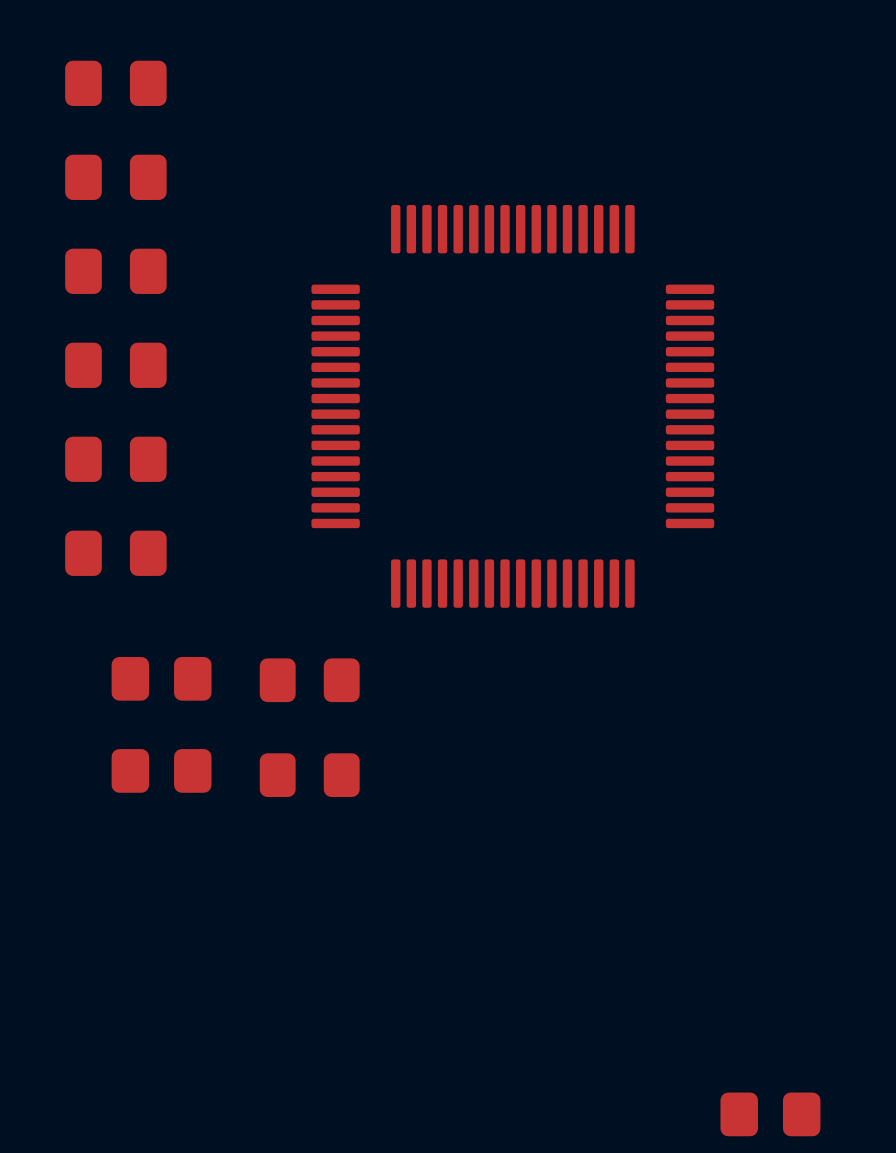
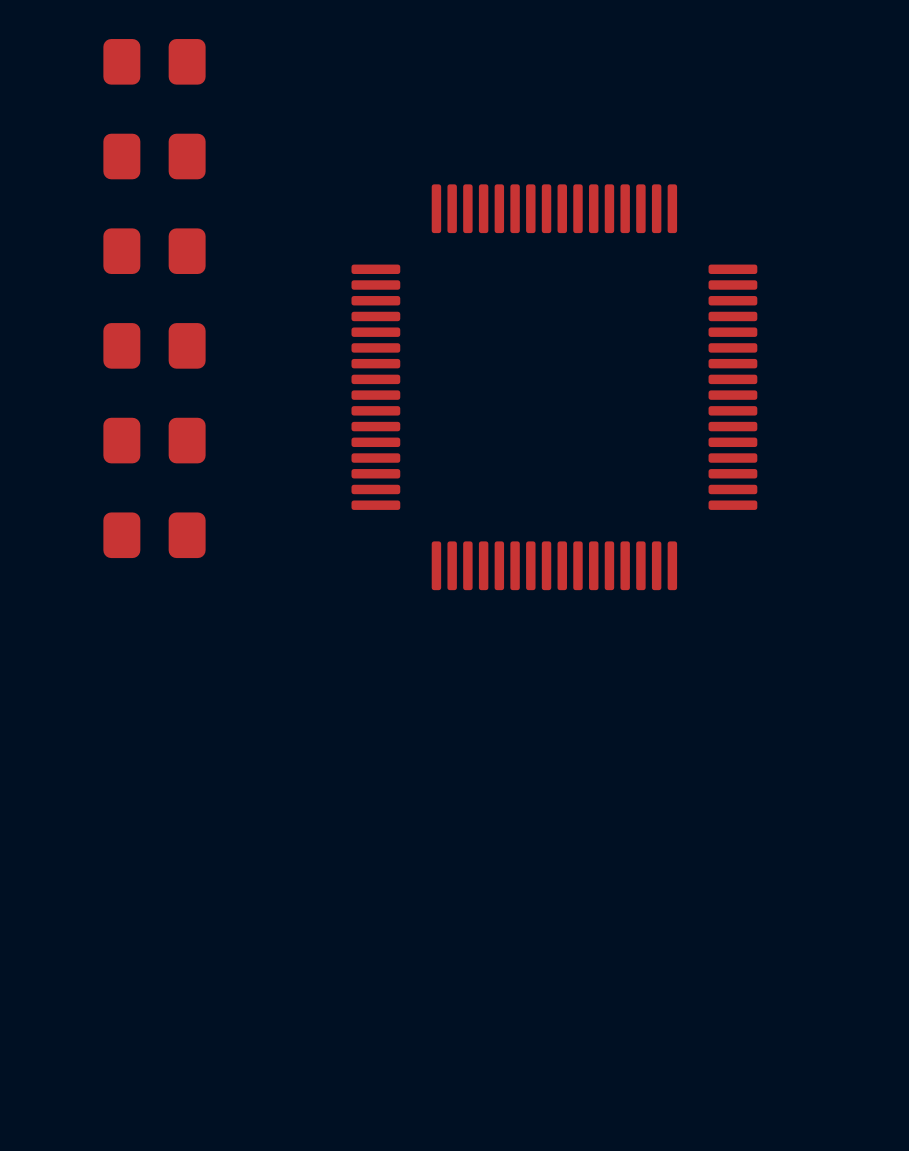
part: (161, 678) -> none
part: (309, 680) -> none
part: (161, 770) -> none
part: (309, 775) -> none
part: (770, 1114) -> none

